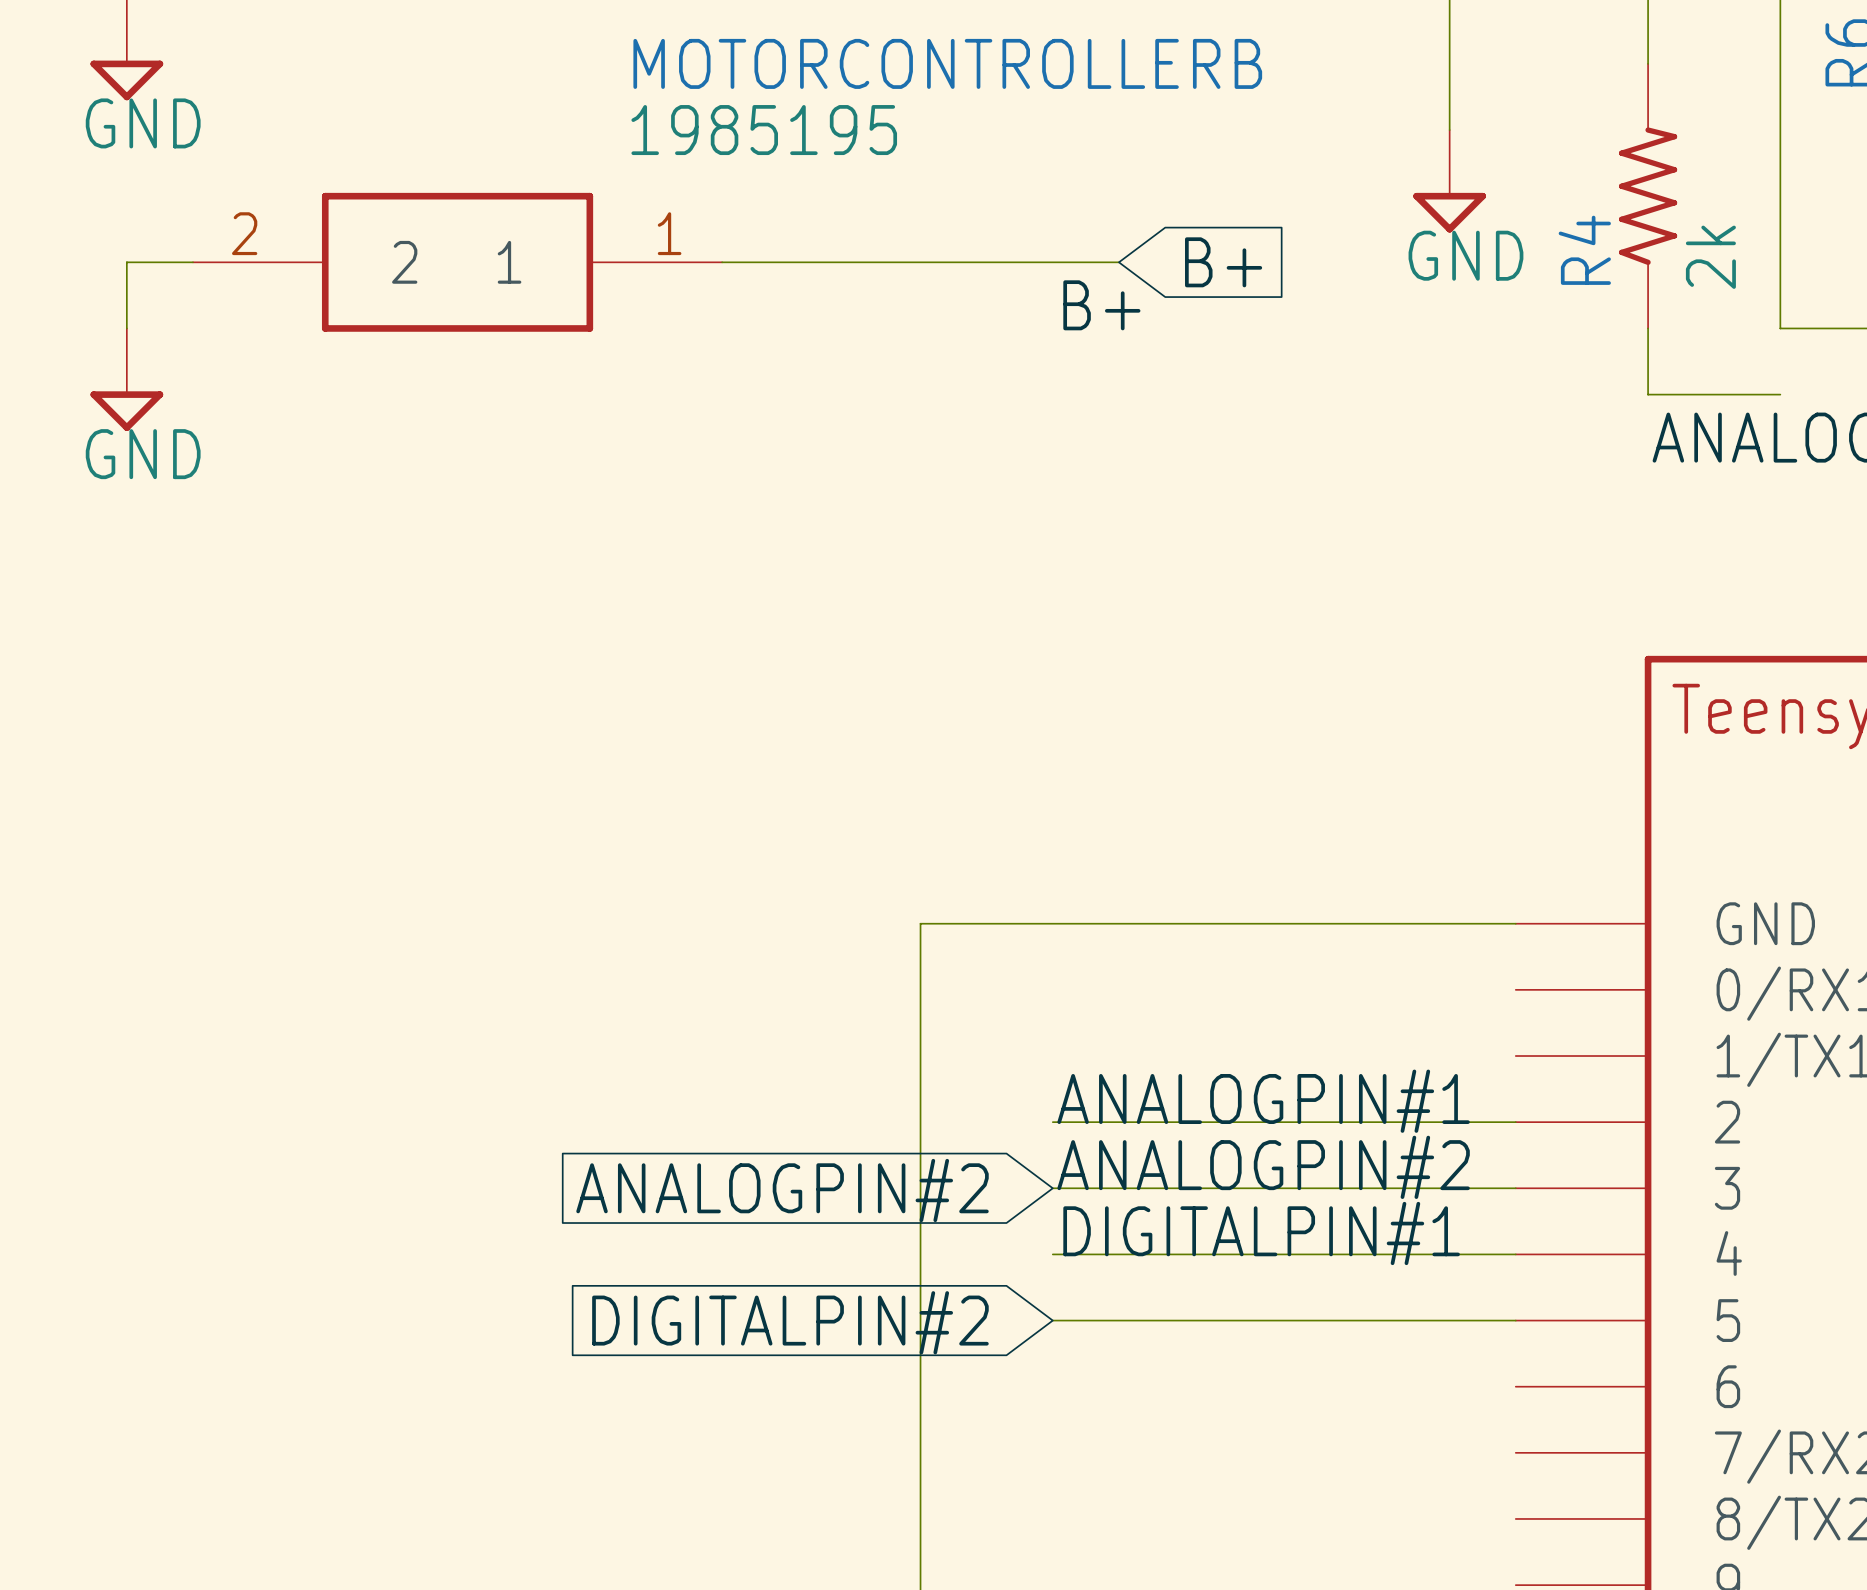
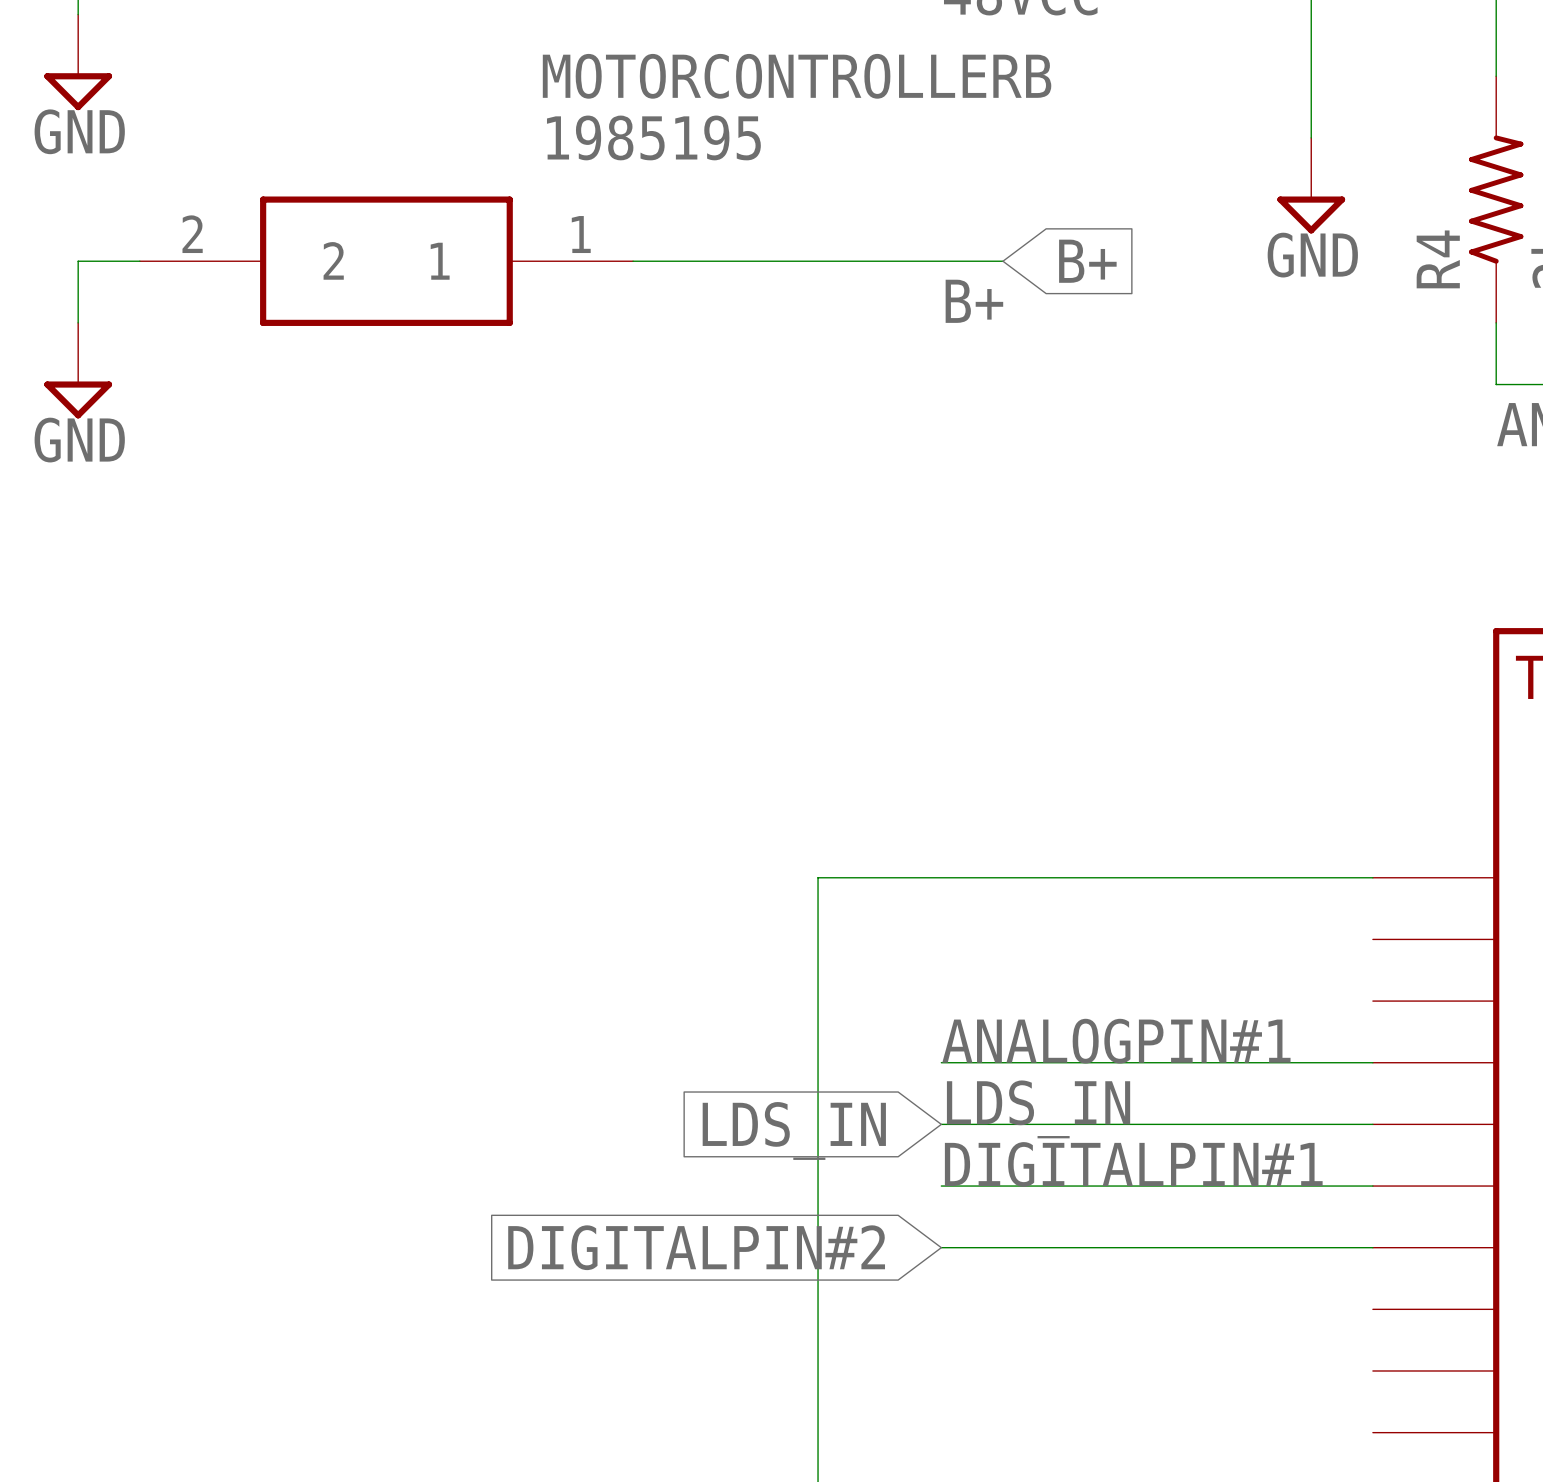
label: ANALOGPIN#2 (1263, 1167) -> LDS_IN (1038, 1109)
global label: ANALOGPIN#2 (782, 1190) -> LDS_IN (794, 1130)

